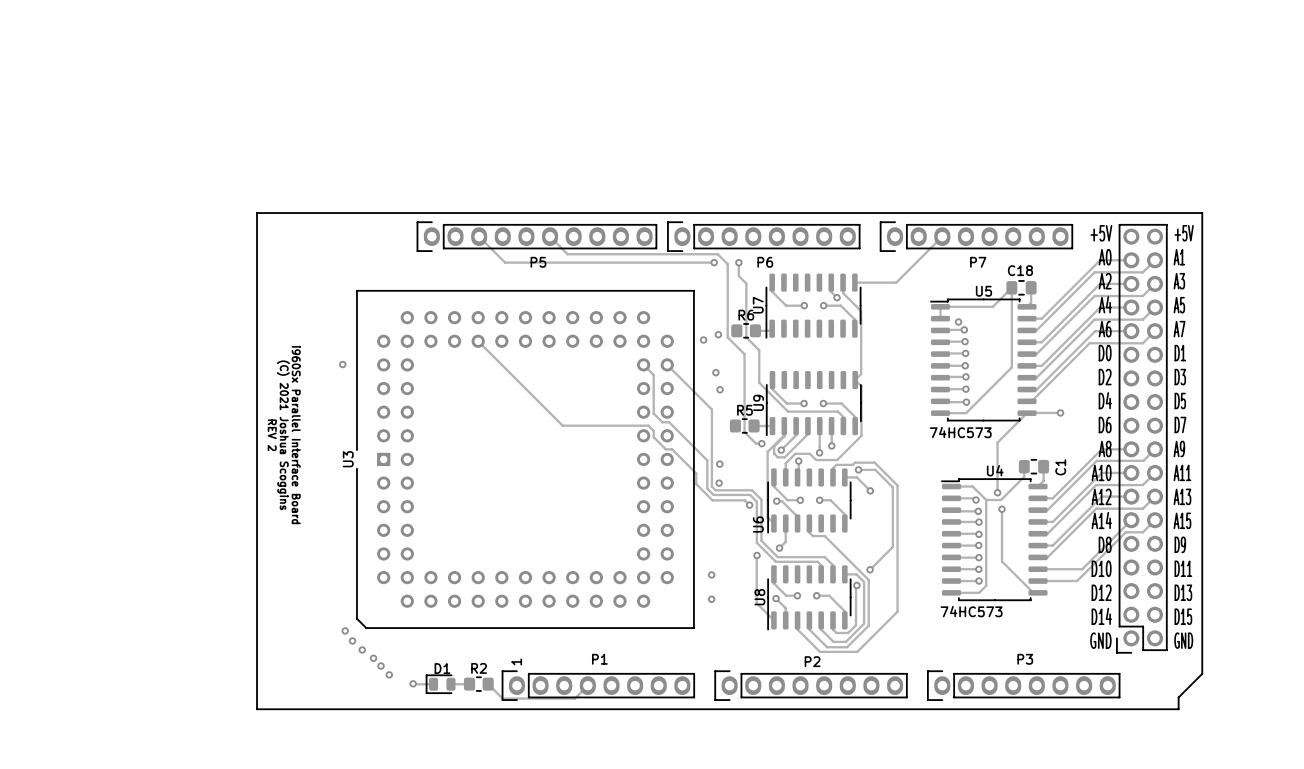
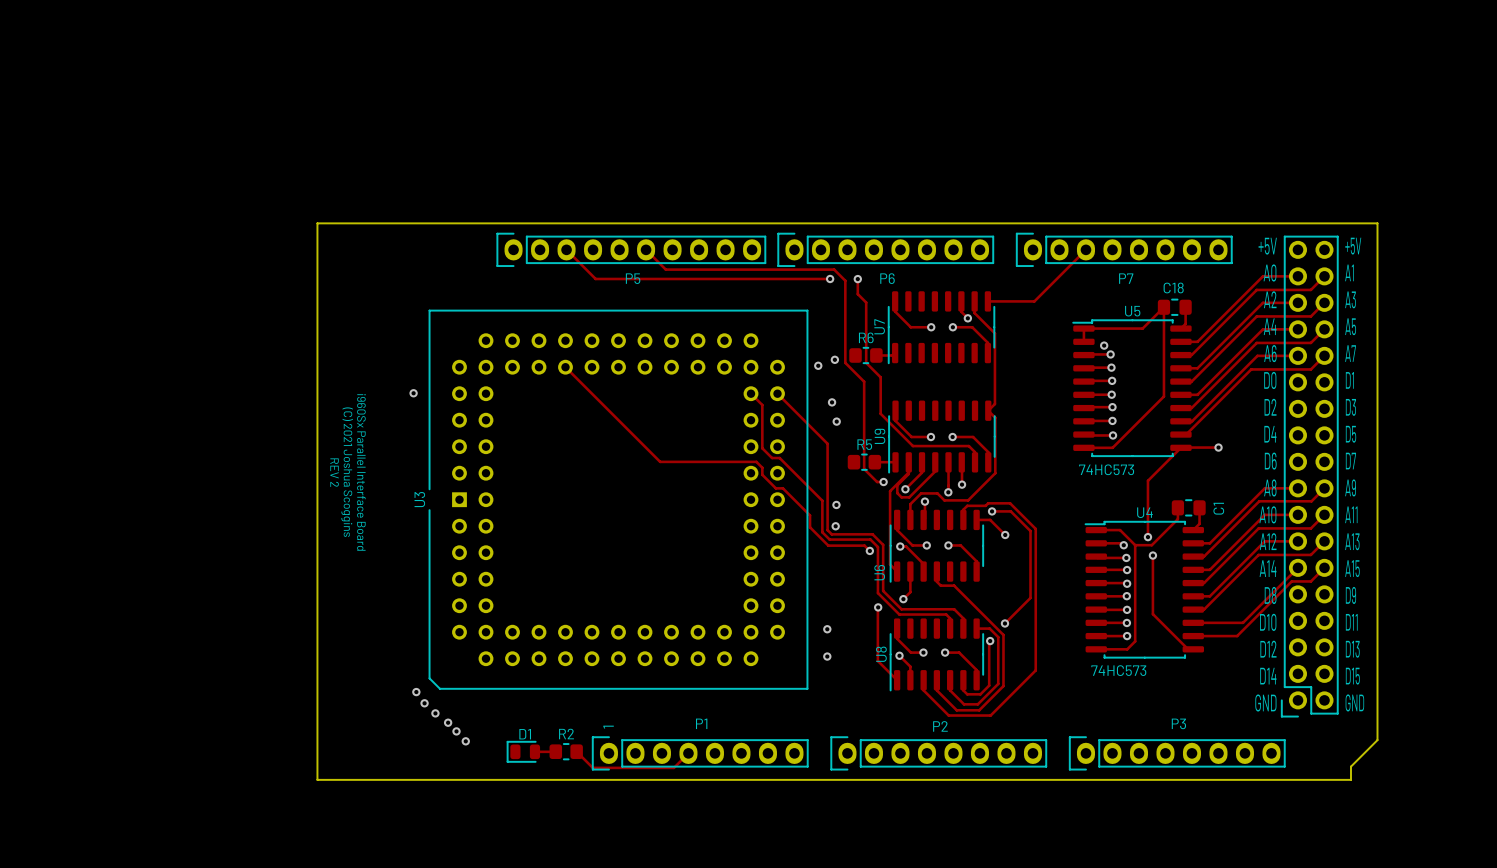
track: (413, 683) (433, 684) -> none
via: (413, 683) -> none

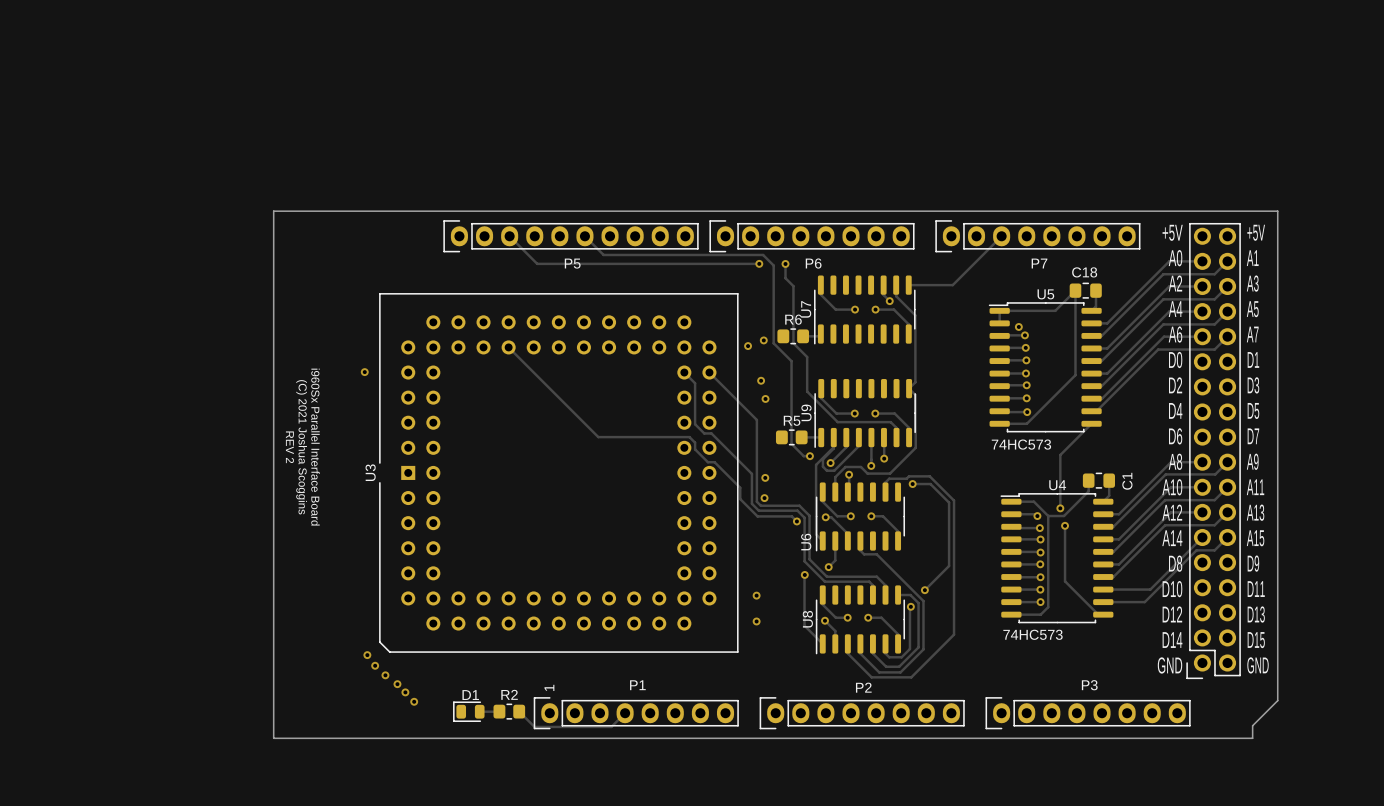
track: (1218, 447) (1180, 447) -> none
via: (1218, 447) -> none
track: (976, 519) (990, 519) (1005, 534) -> none
via: (1005, 534) -> none

